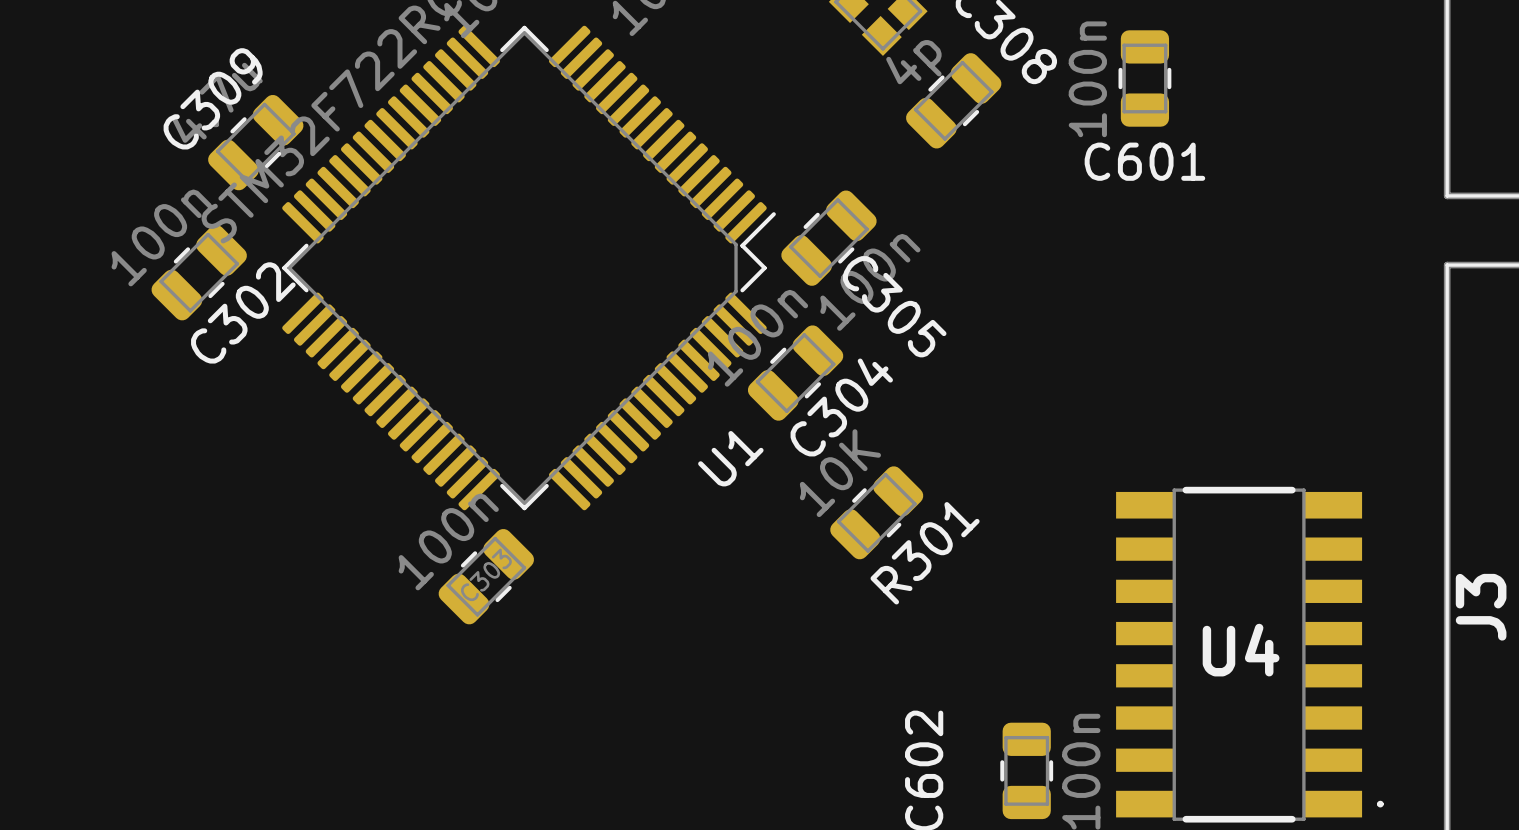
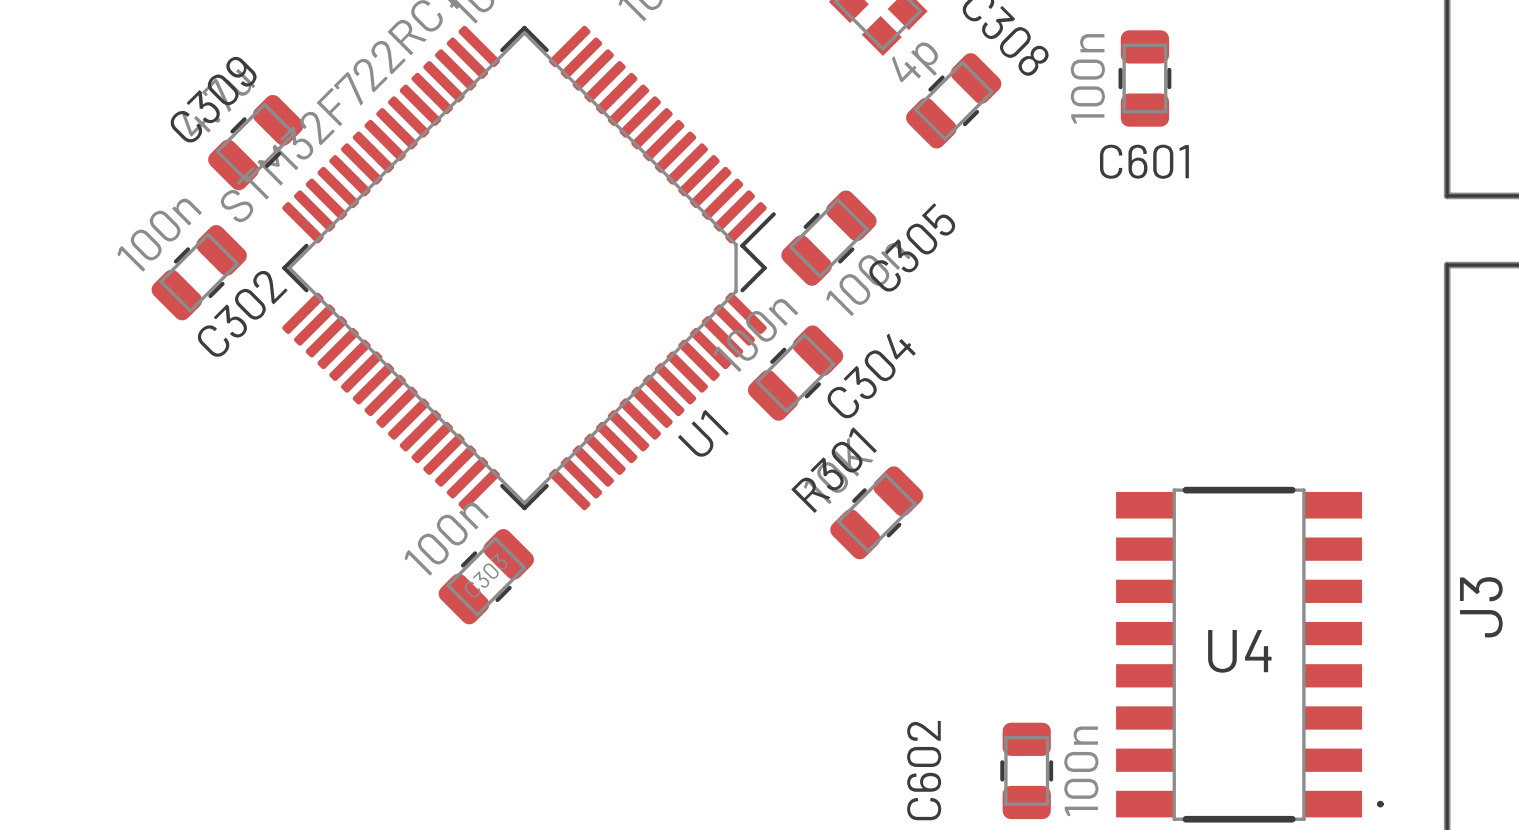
C305 name rotation: 0° (894, 306) -> 90° counterclockwise (912, 247)
C304 name position: C304 (841, 407) -> C304 (871, 376)
U1 name position: U1 (730, 458) -> U1 (703, 433)
R301 name position: R301 (925, 553) -> R301 (834, 470)

